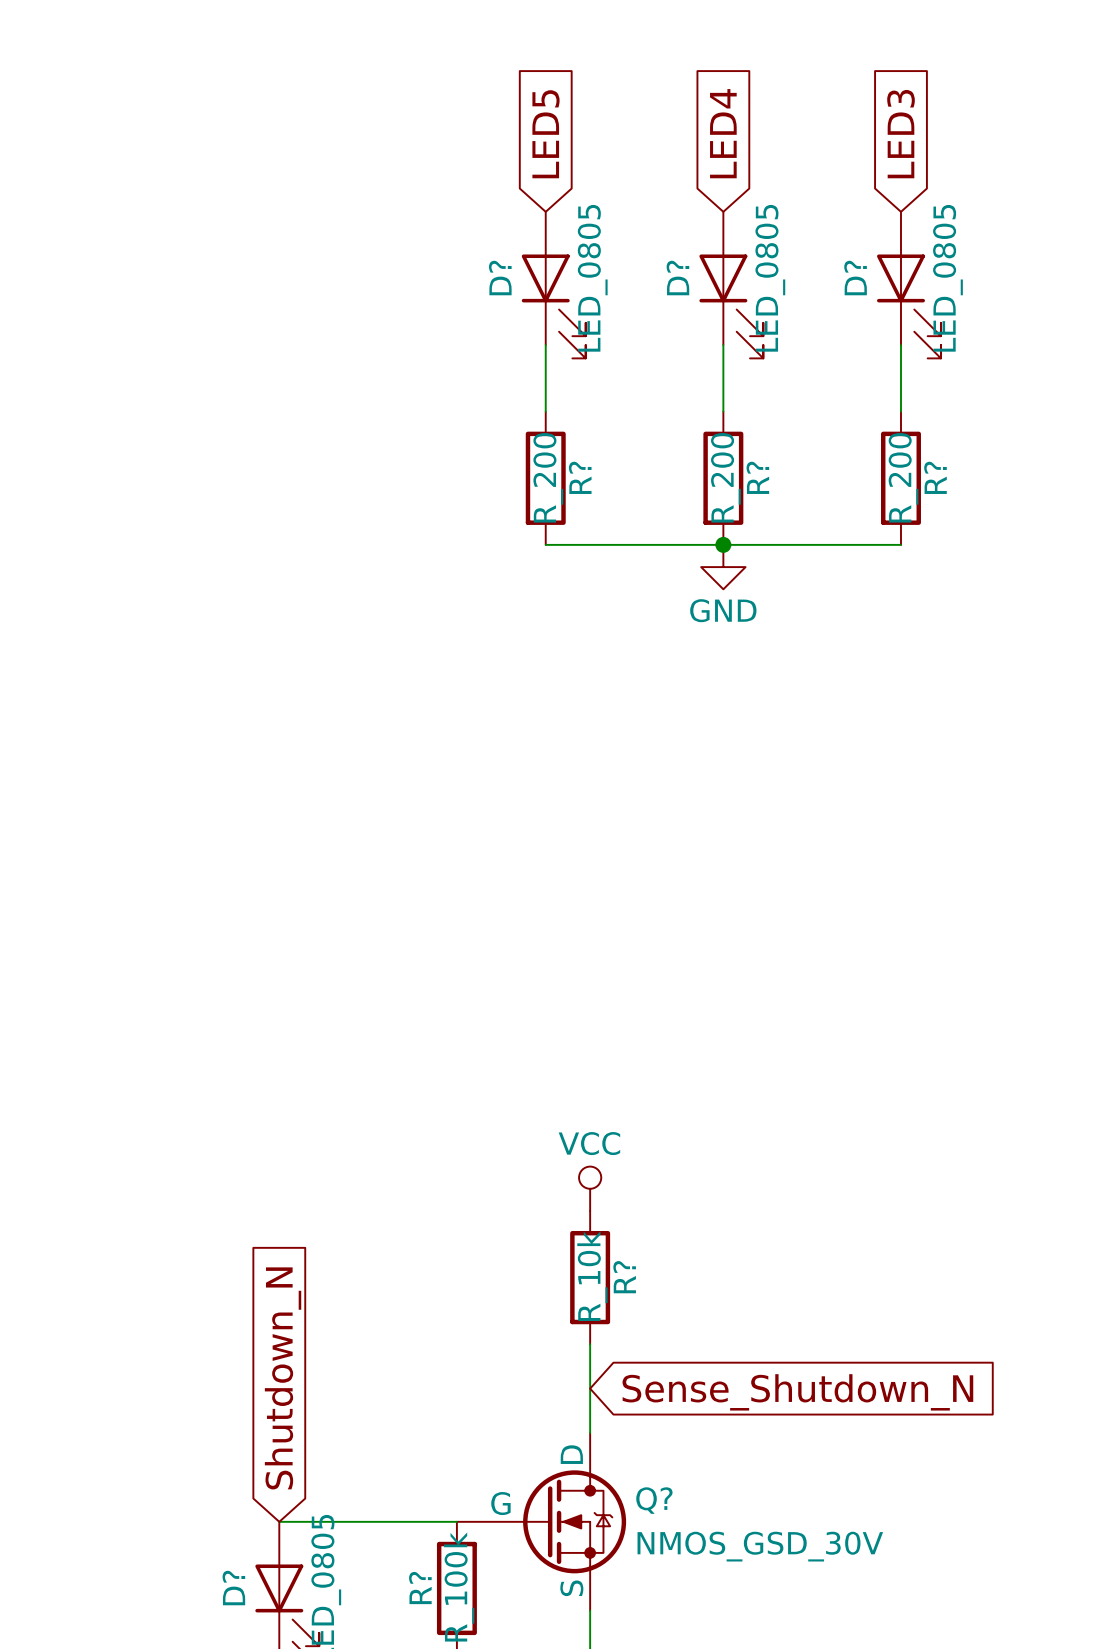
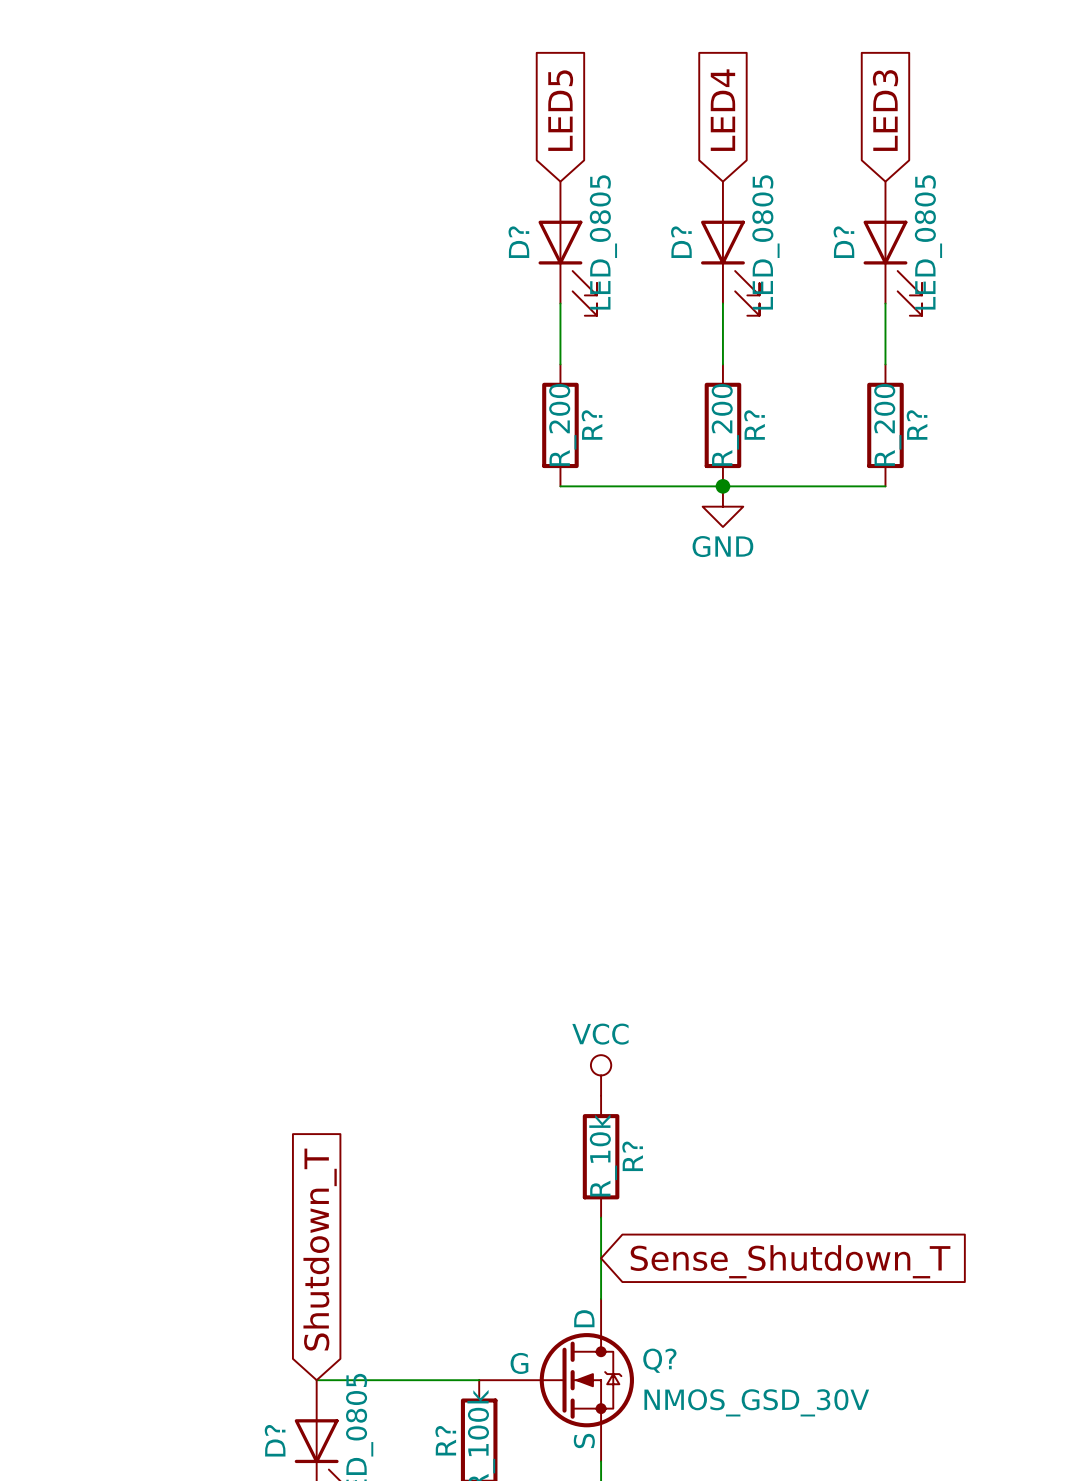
global label: Shutdown_N (283, 1378) -> Shutdown_T (320, 1249)
global label: Sense_Shutdown_N (797, 1392) -> Sense_Shutdown_T (790, 1261)

